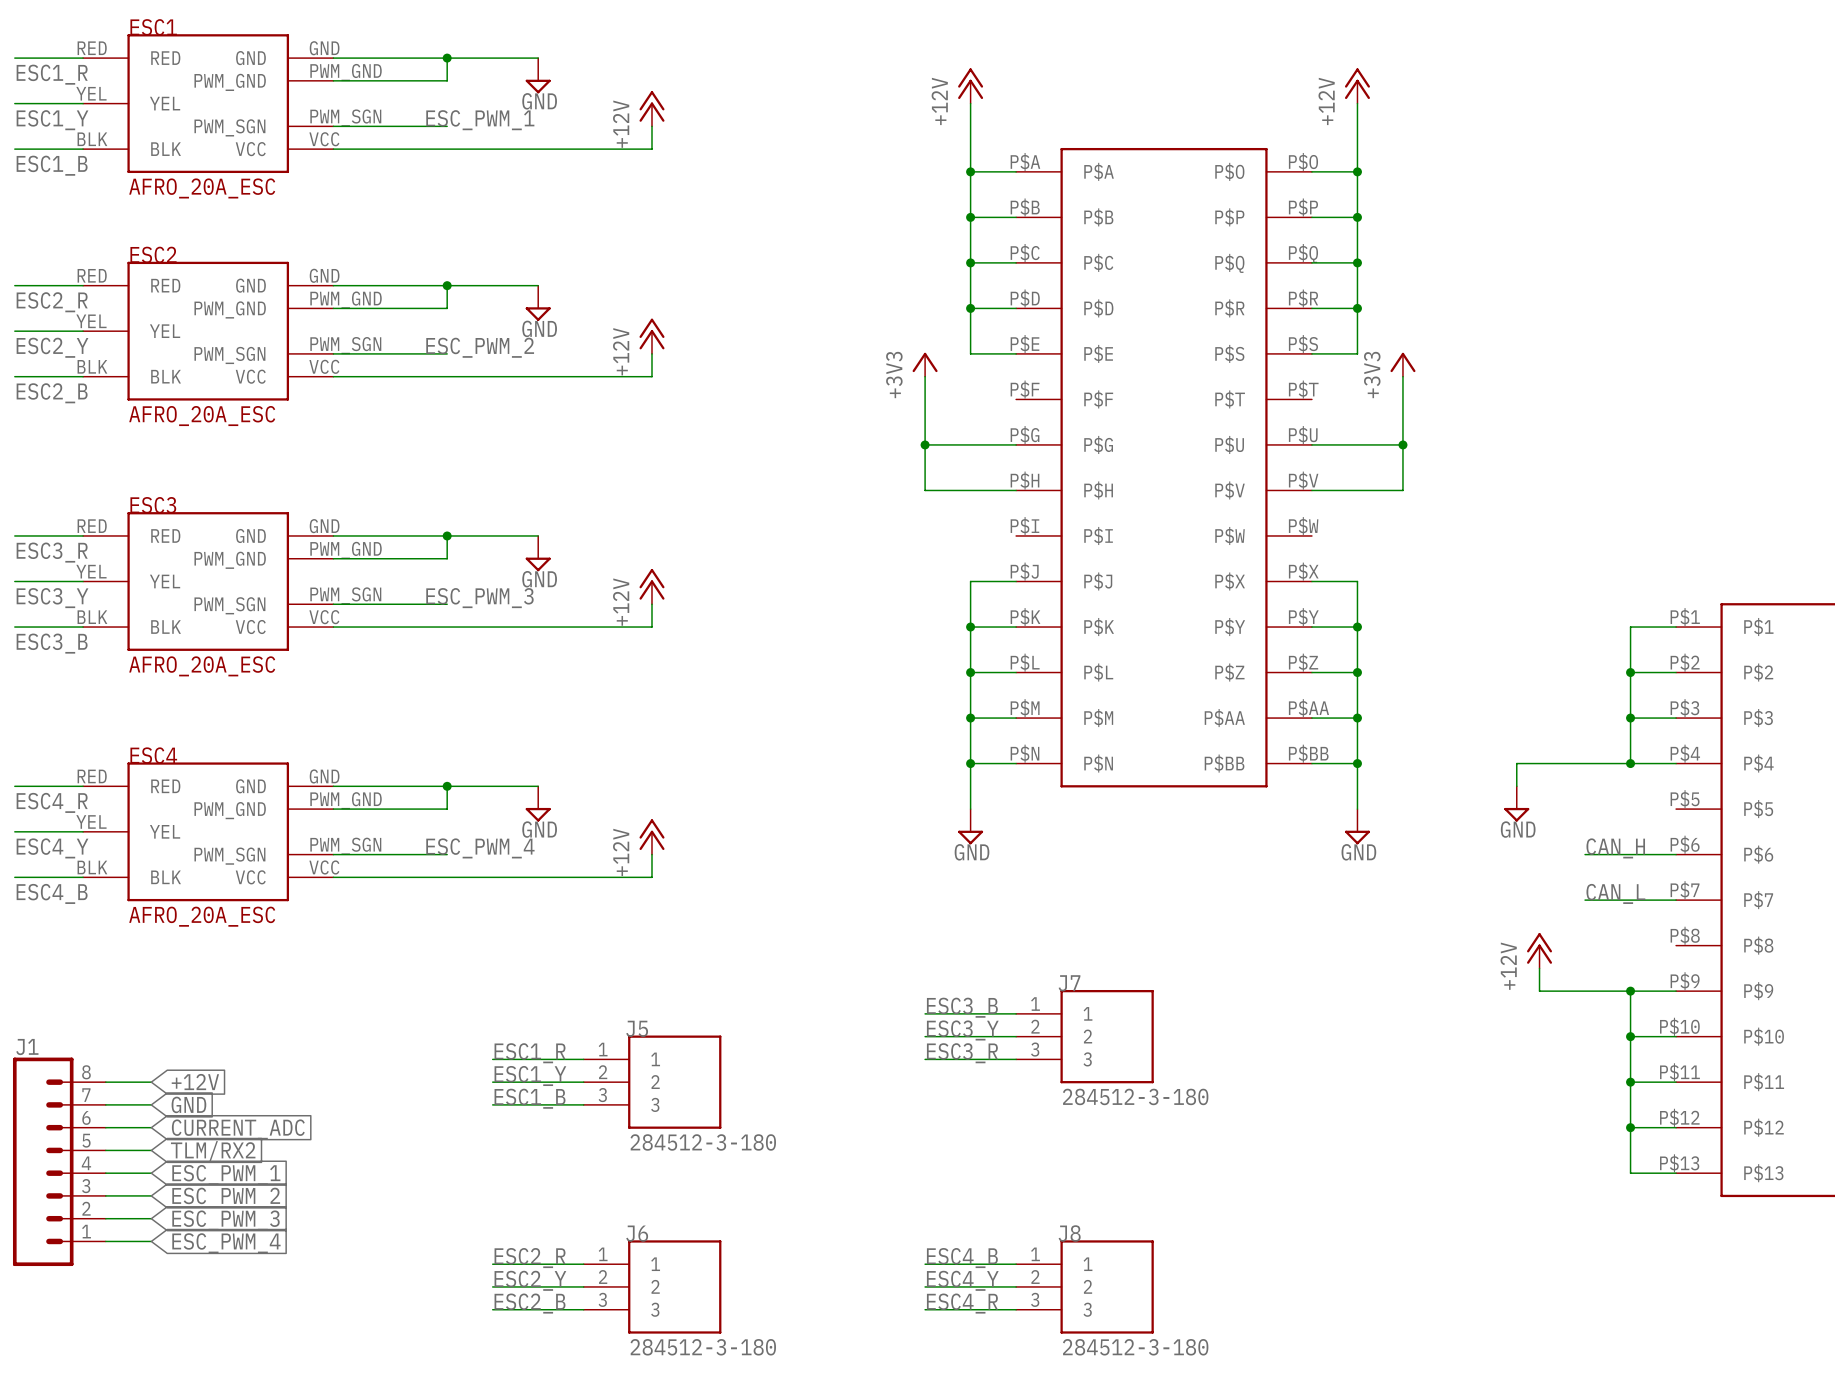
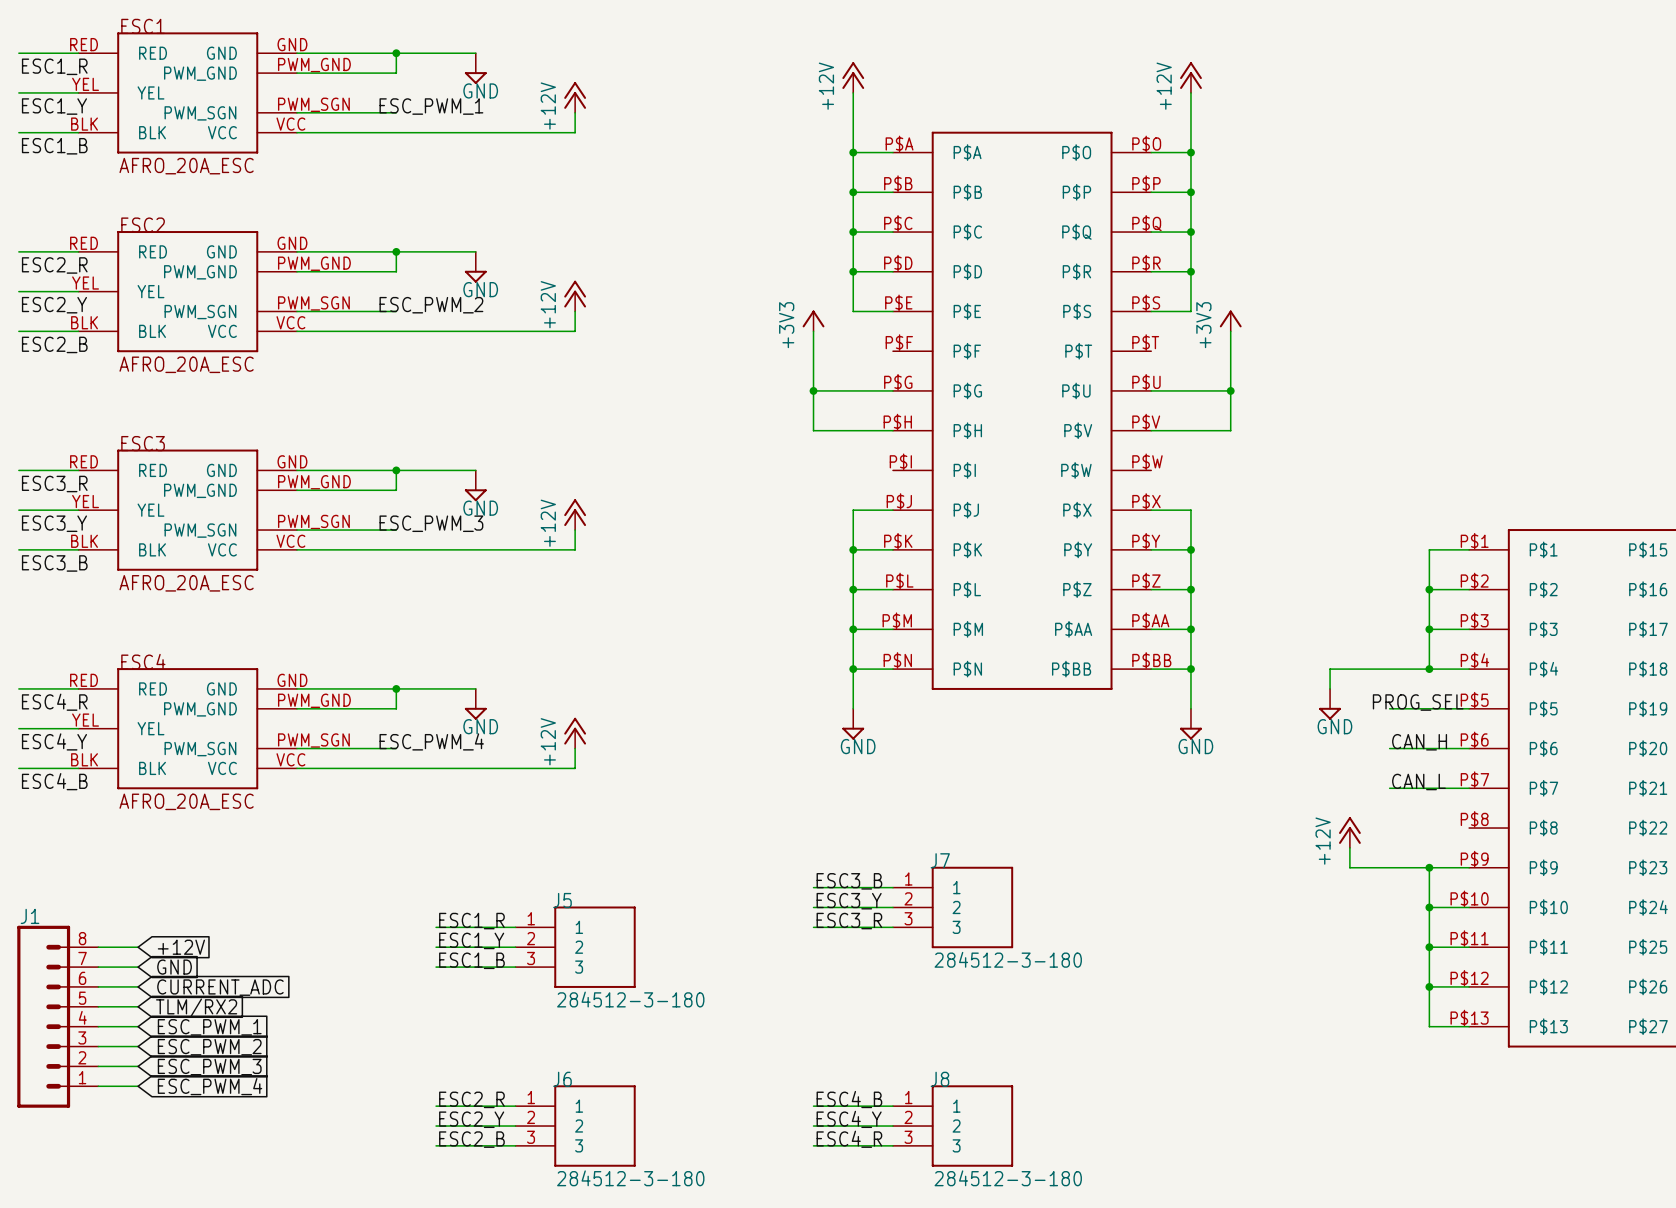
label: none -> PROG_SEL (1418, 702)
wire: none -> (1389, 708) (1469, 708)

